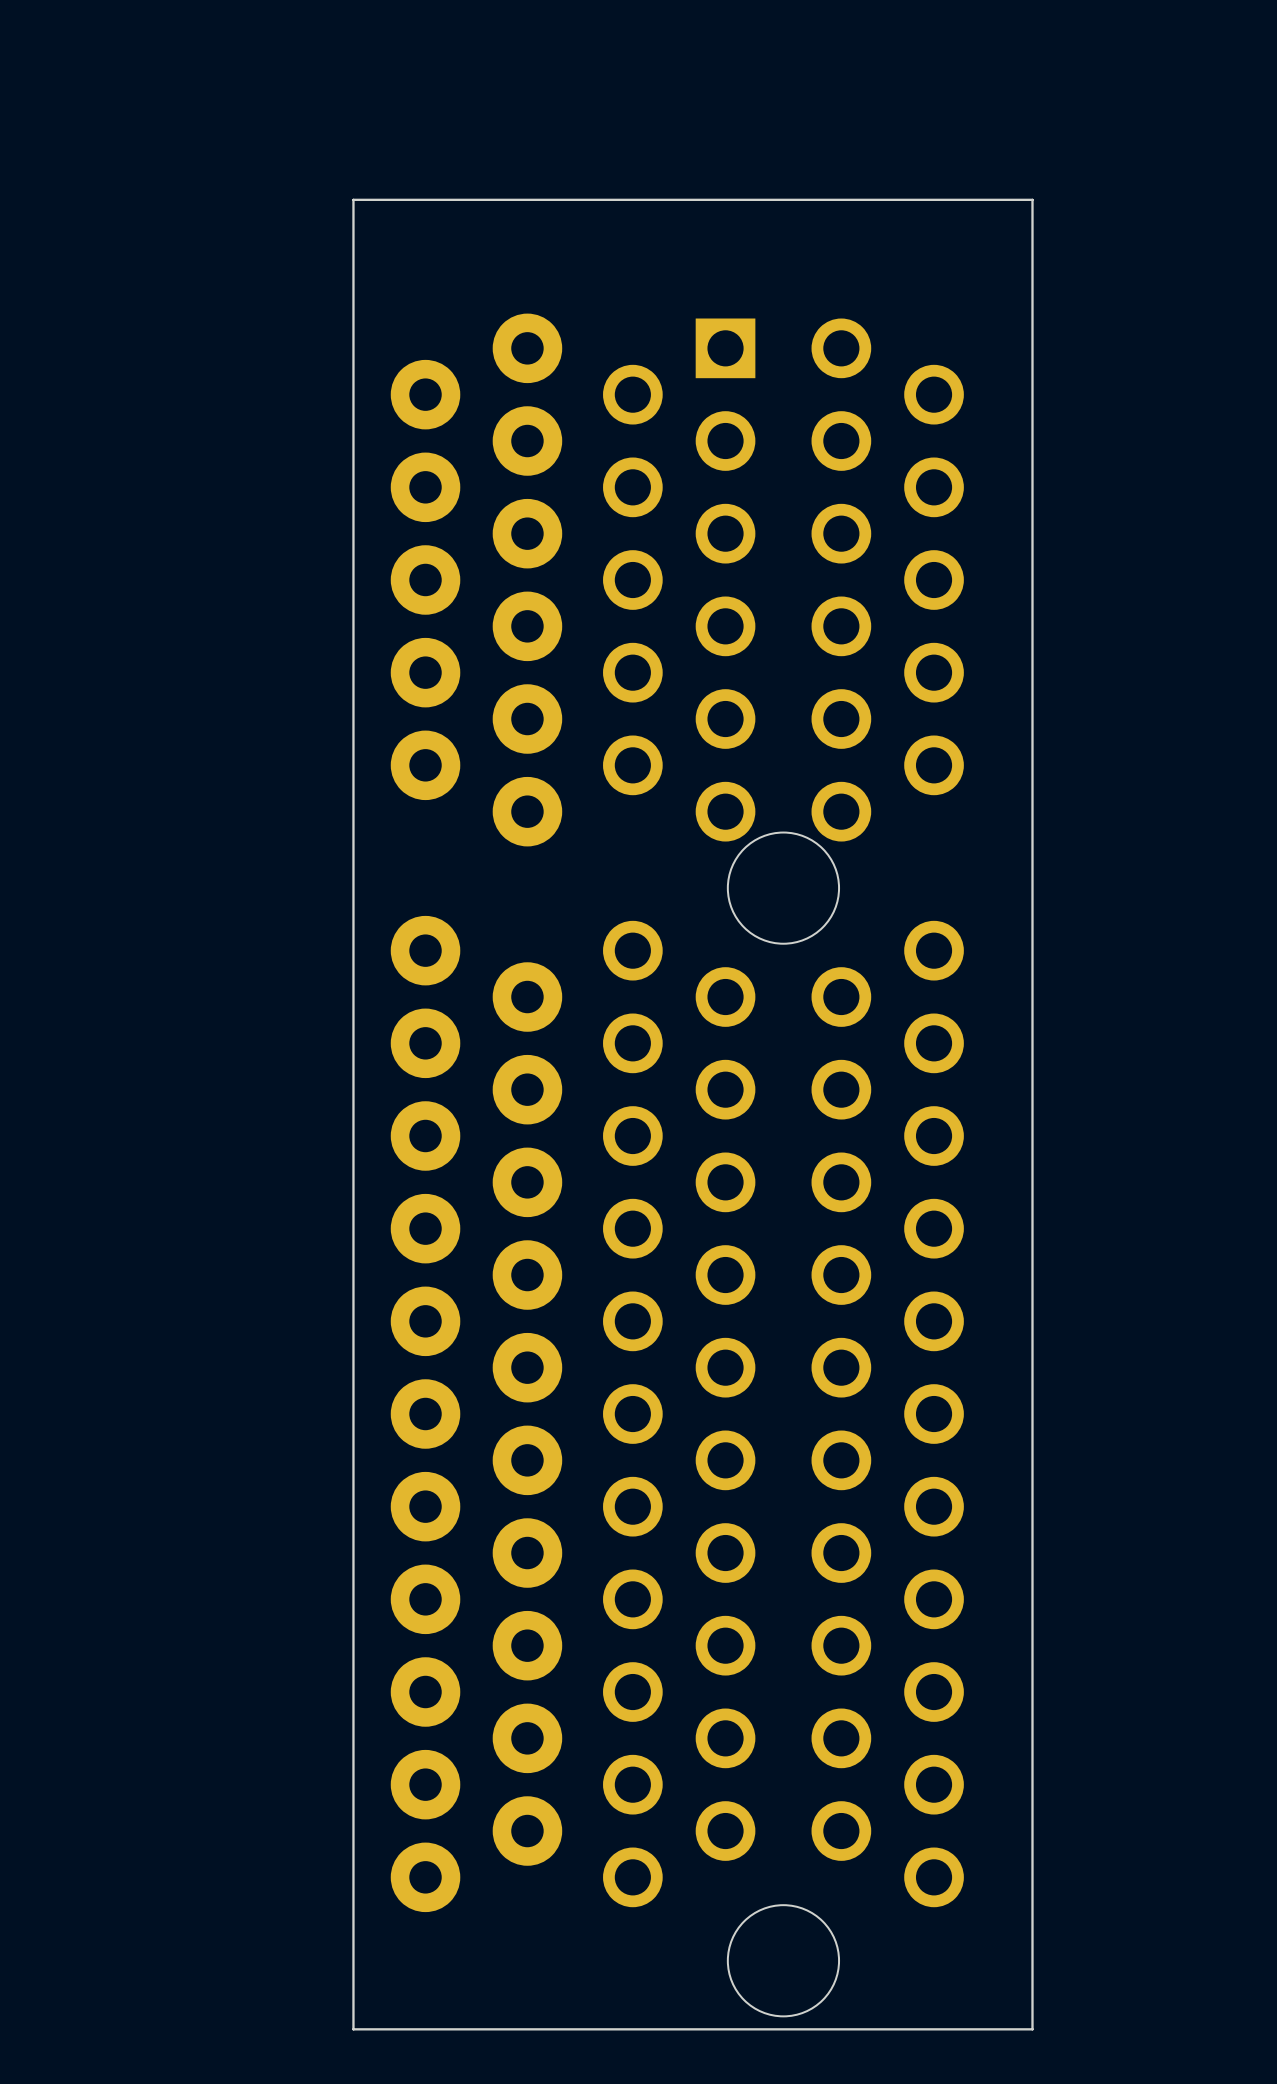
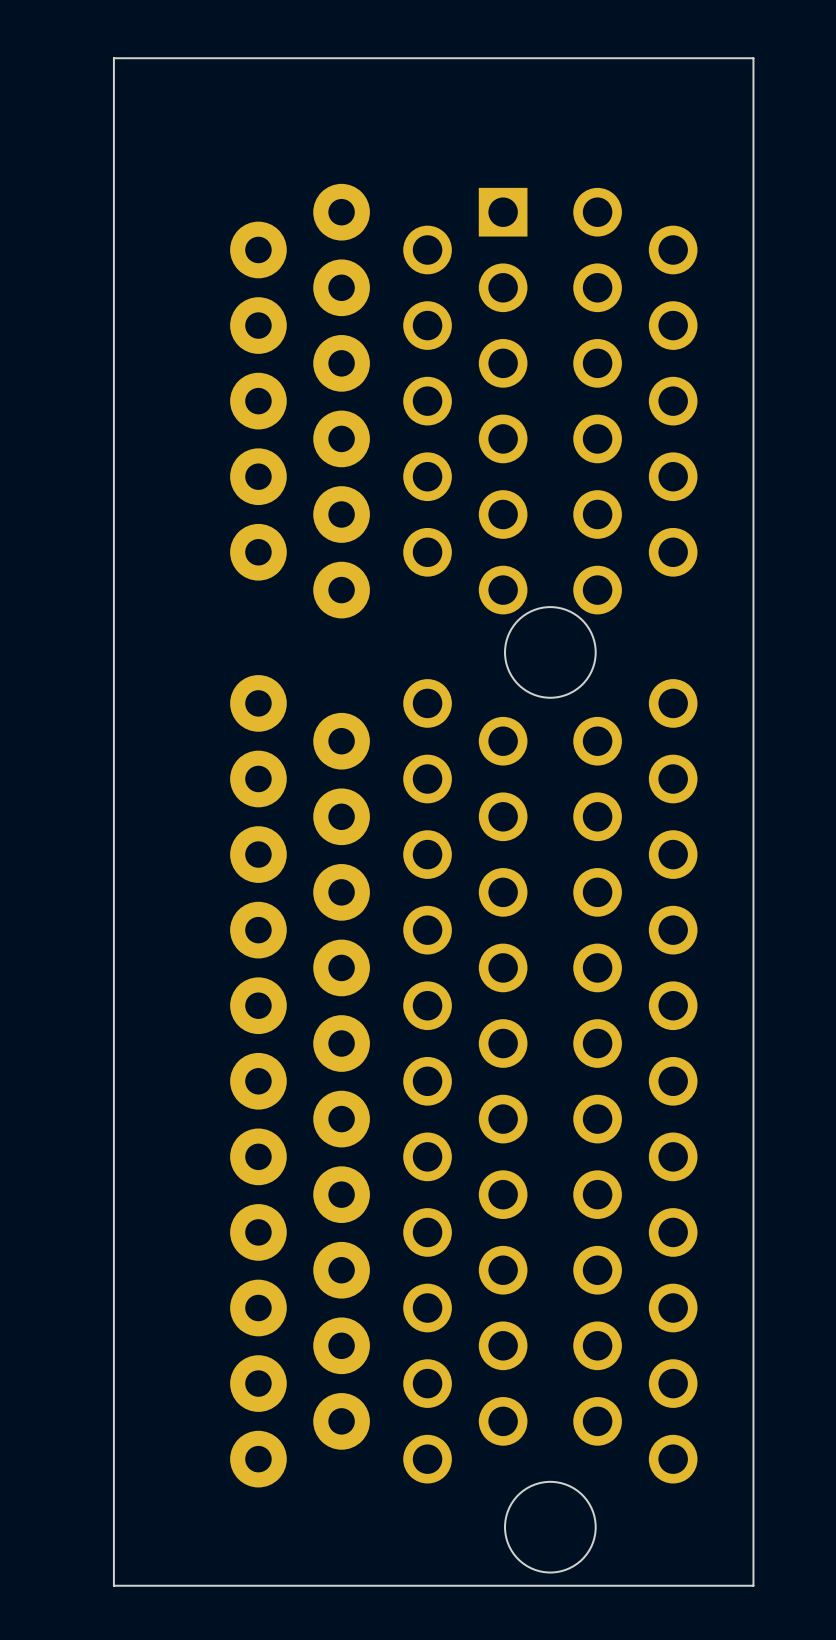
board edge: (1032, 199) (353, 199) (353, 2029) (1032, 2029) -> (753, 91) (753, 58) (113, 58) (113, 1585) (753, 1585) (753, 1583)

